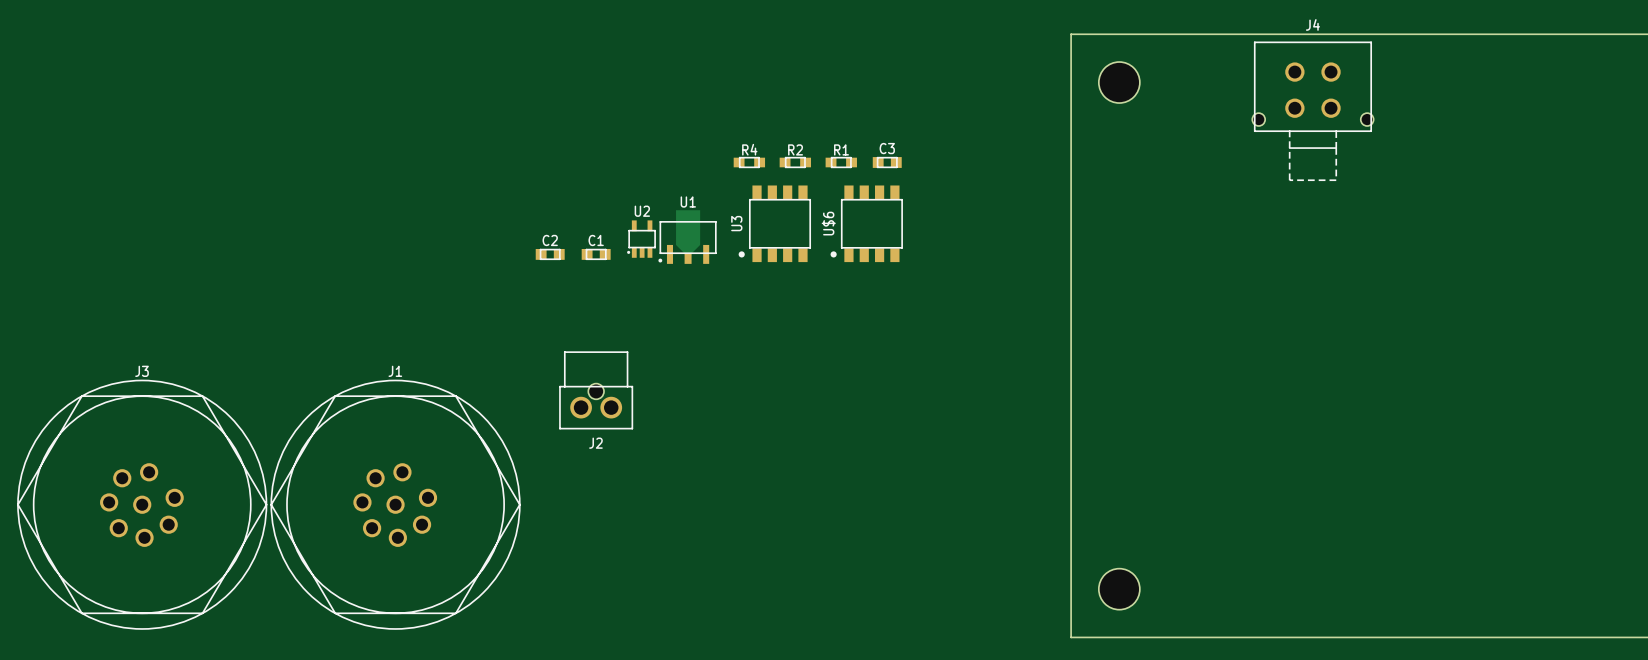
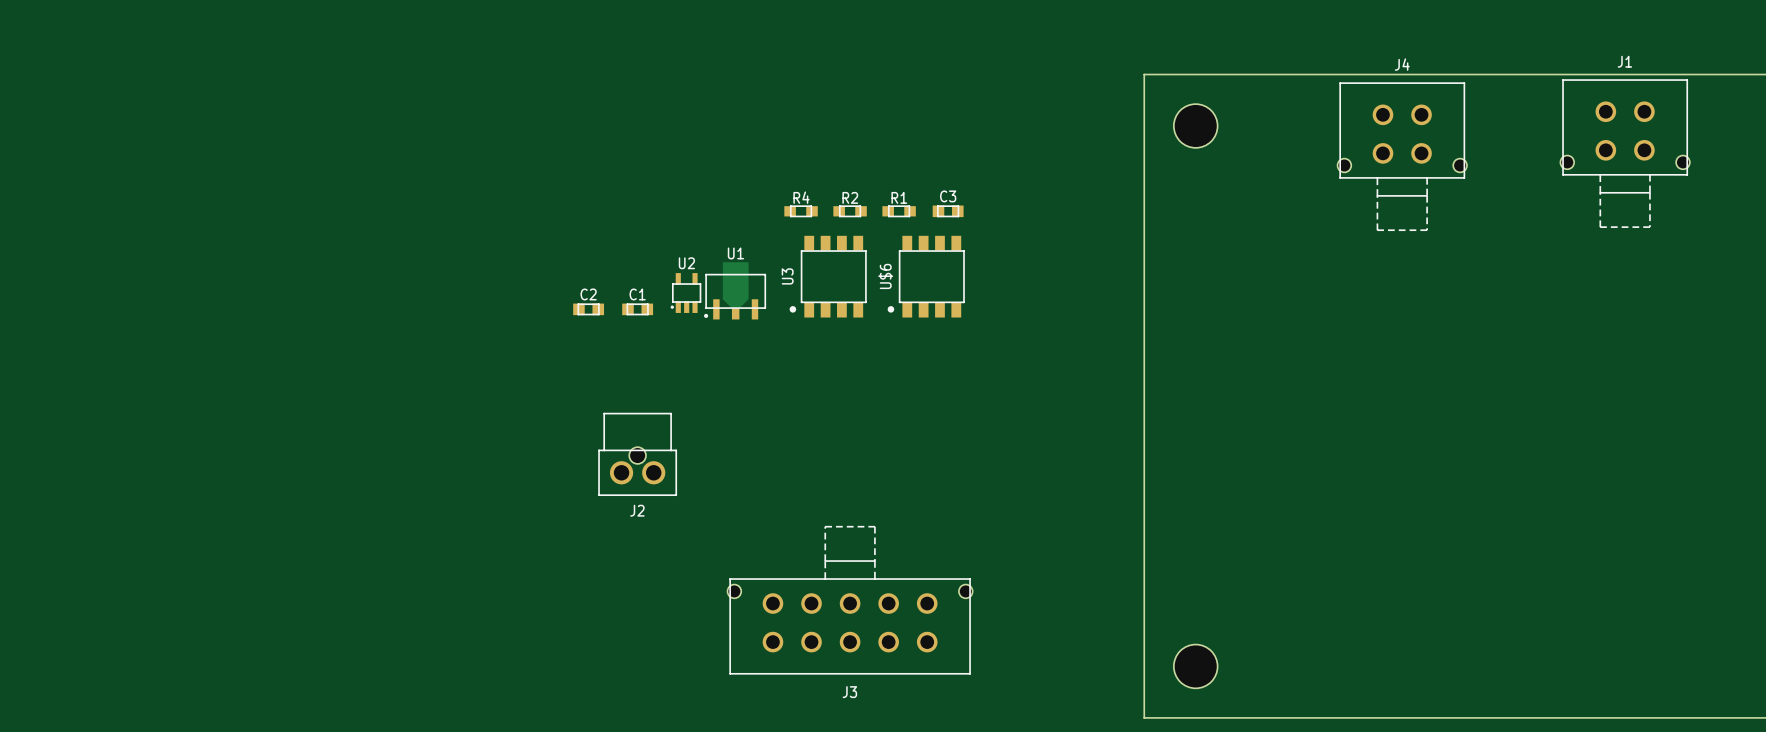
J3 name position: J3 (142, 371) -> J3 (849, 692)
J1 name position: J1 (395, 371) -> J1 (1624, 61)
J3 footprint: [17, 379, 268, 630] -> [727, 525, 973, 675]
J1 footprint: [270, 379, 521, 630] -> [1560, 79, 1690, 228]

